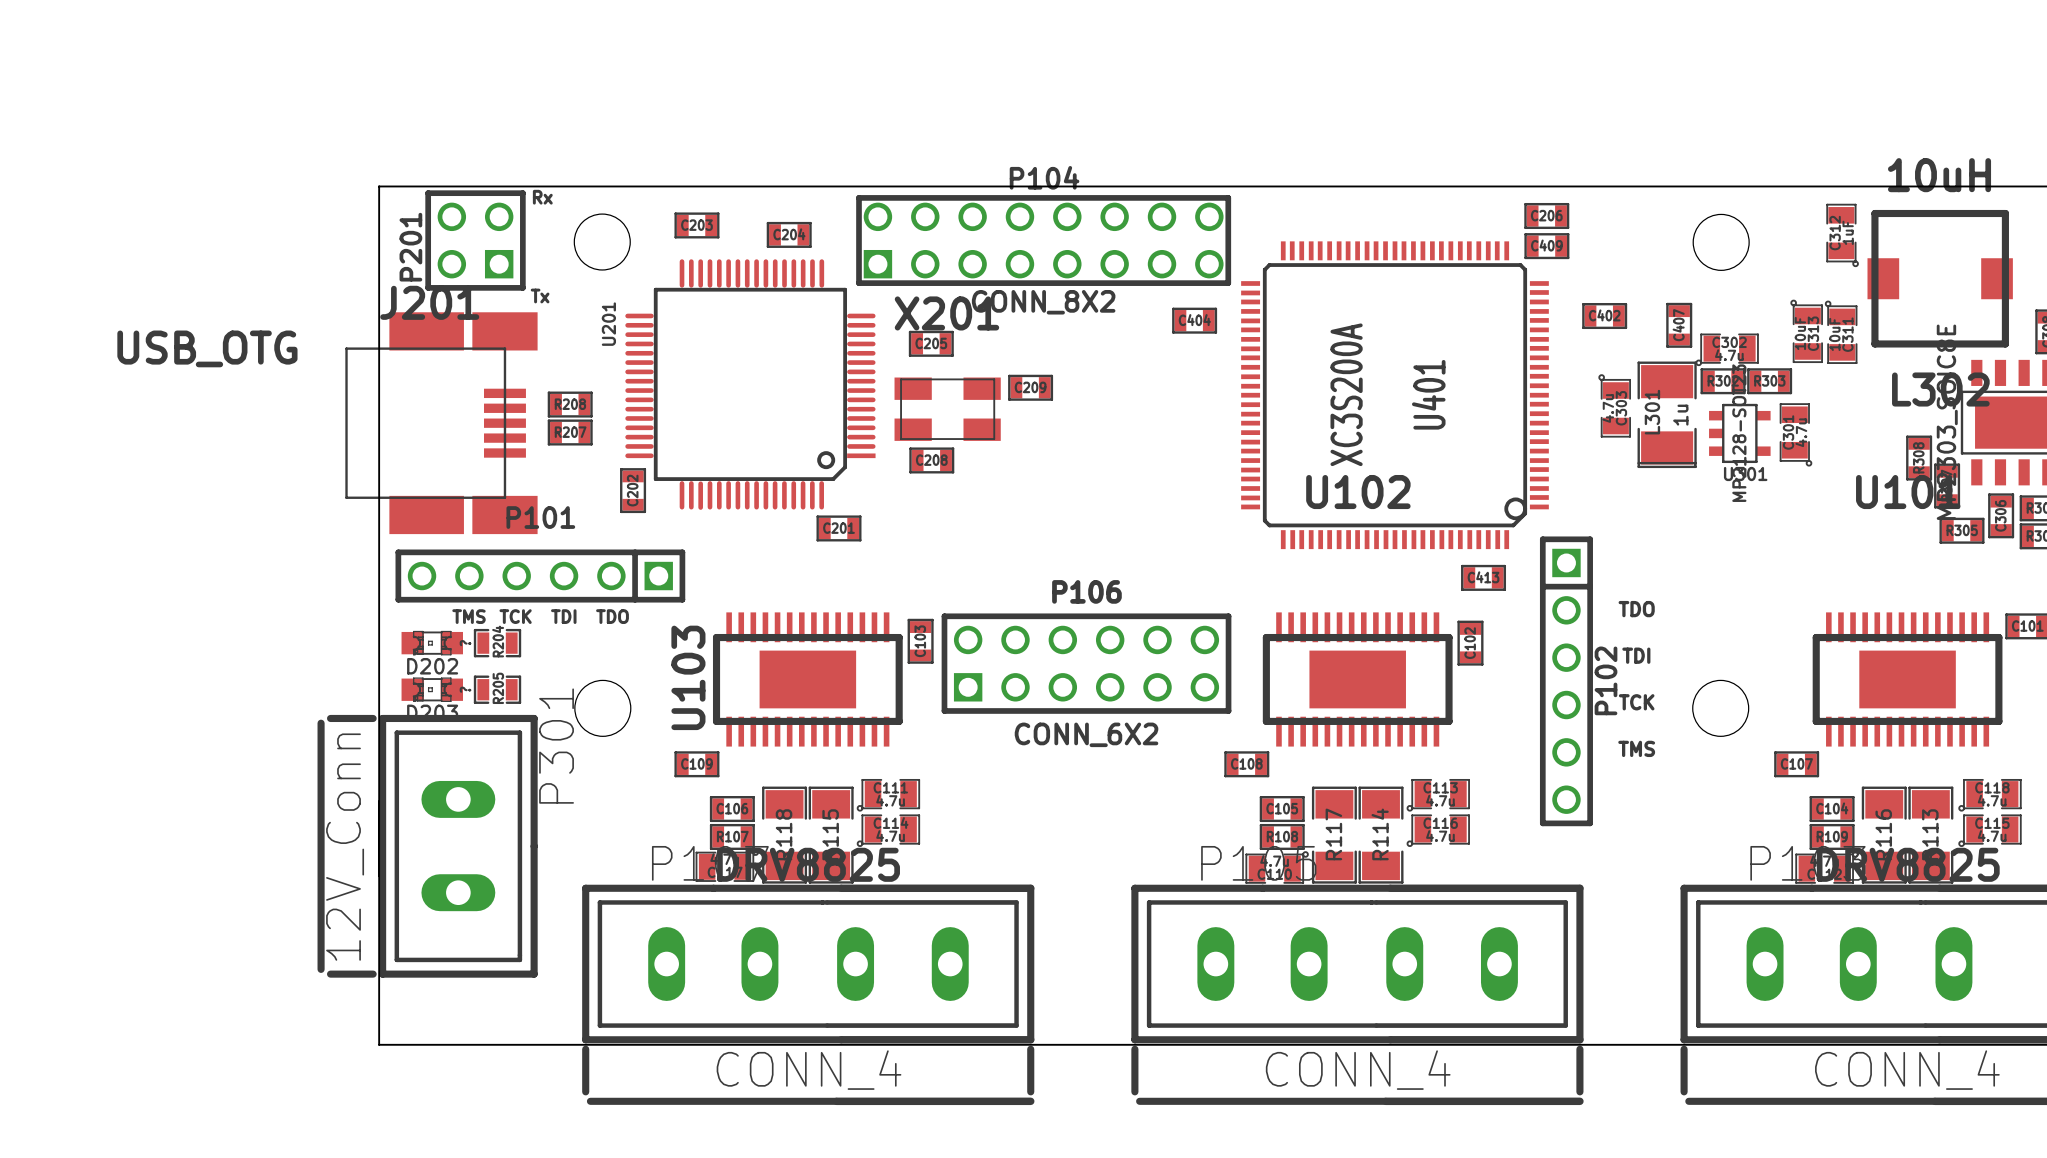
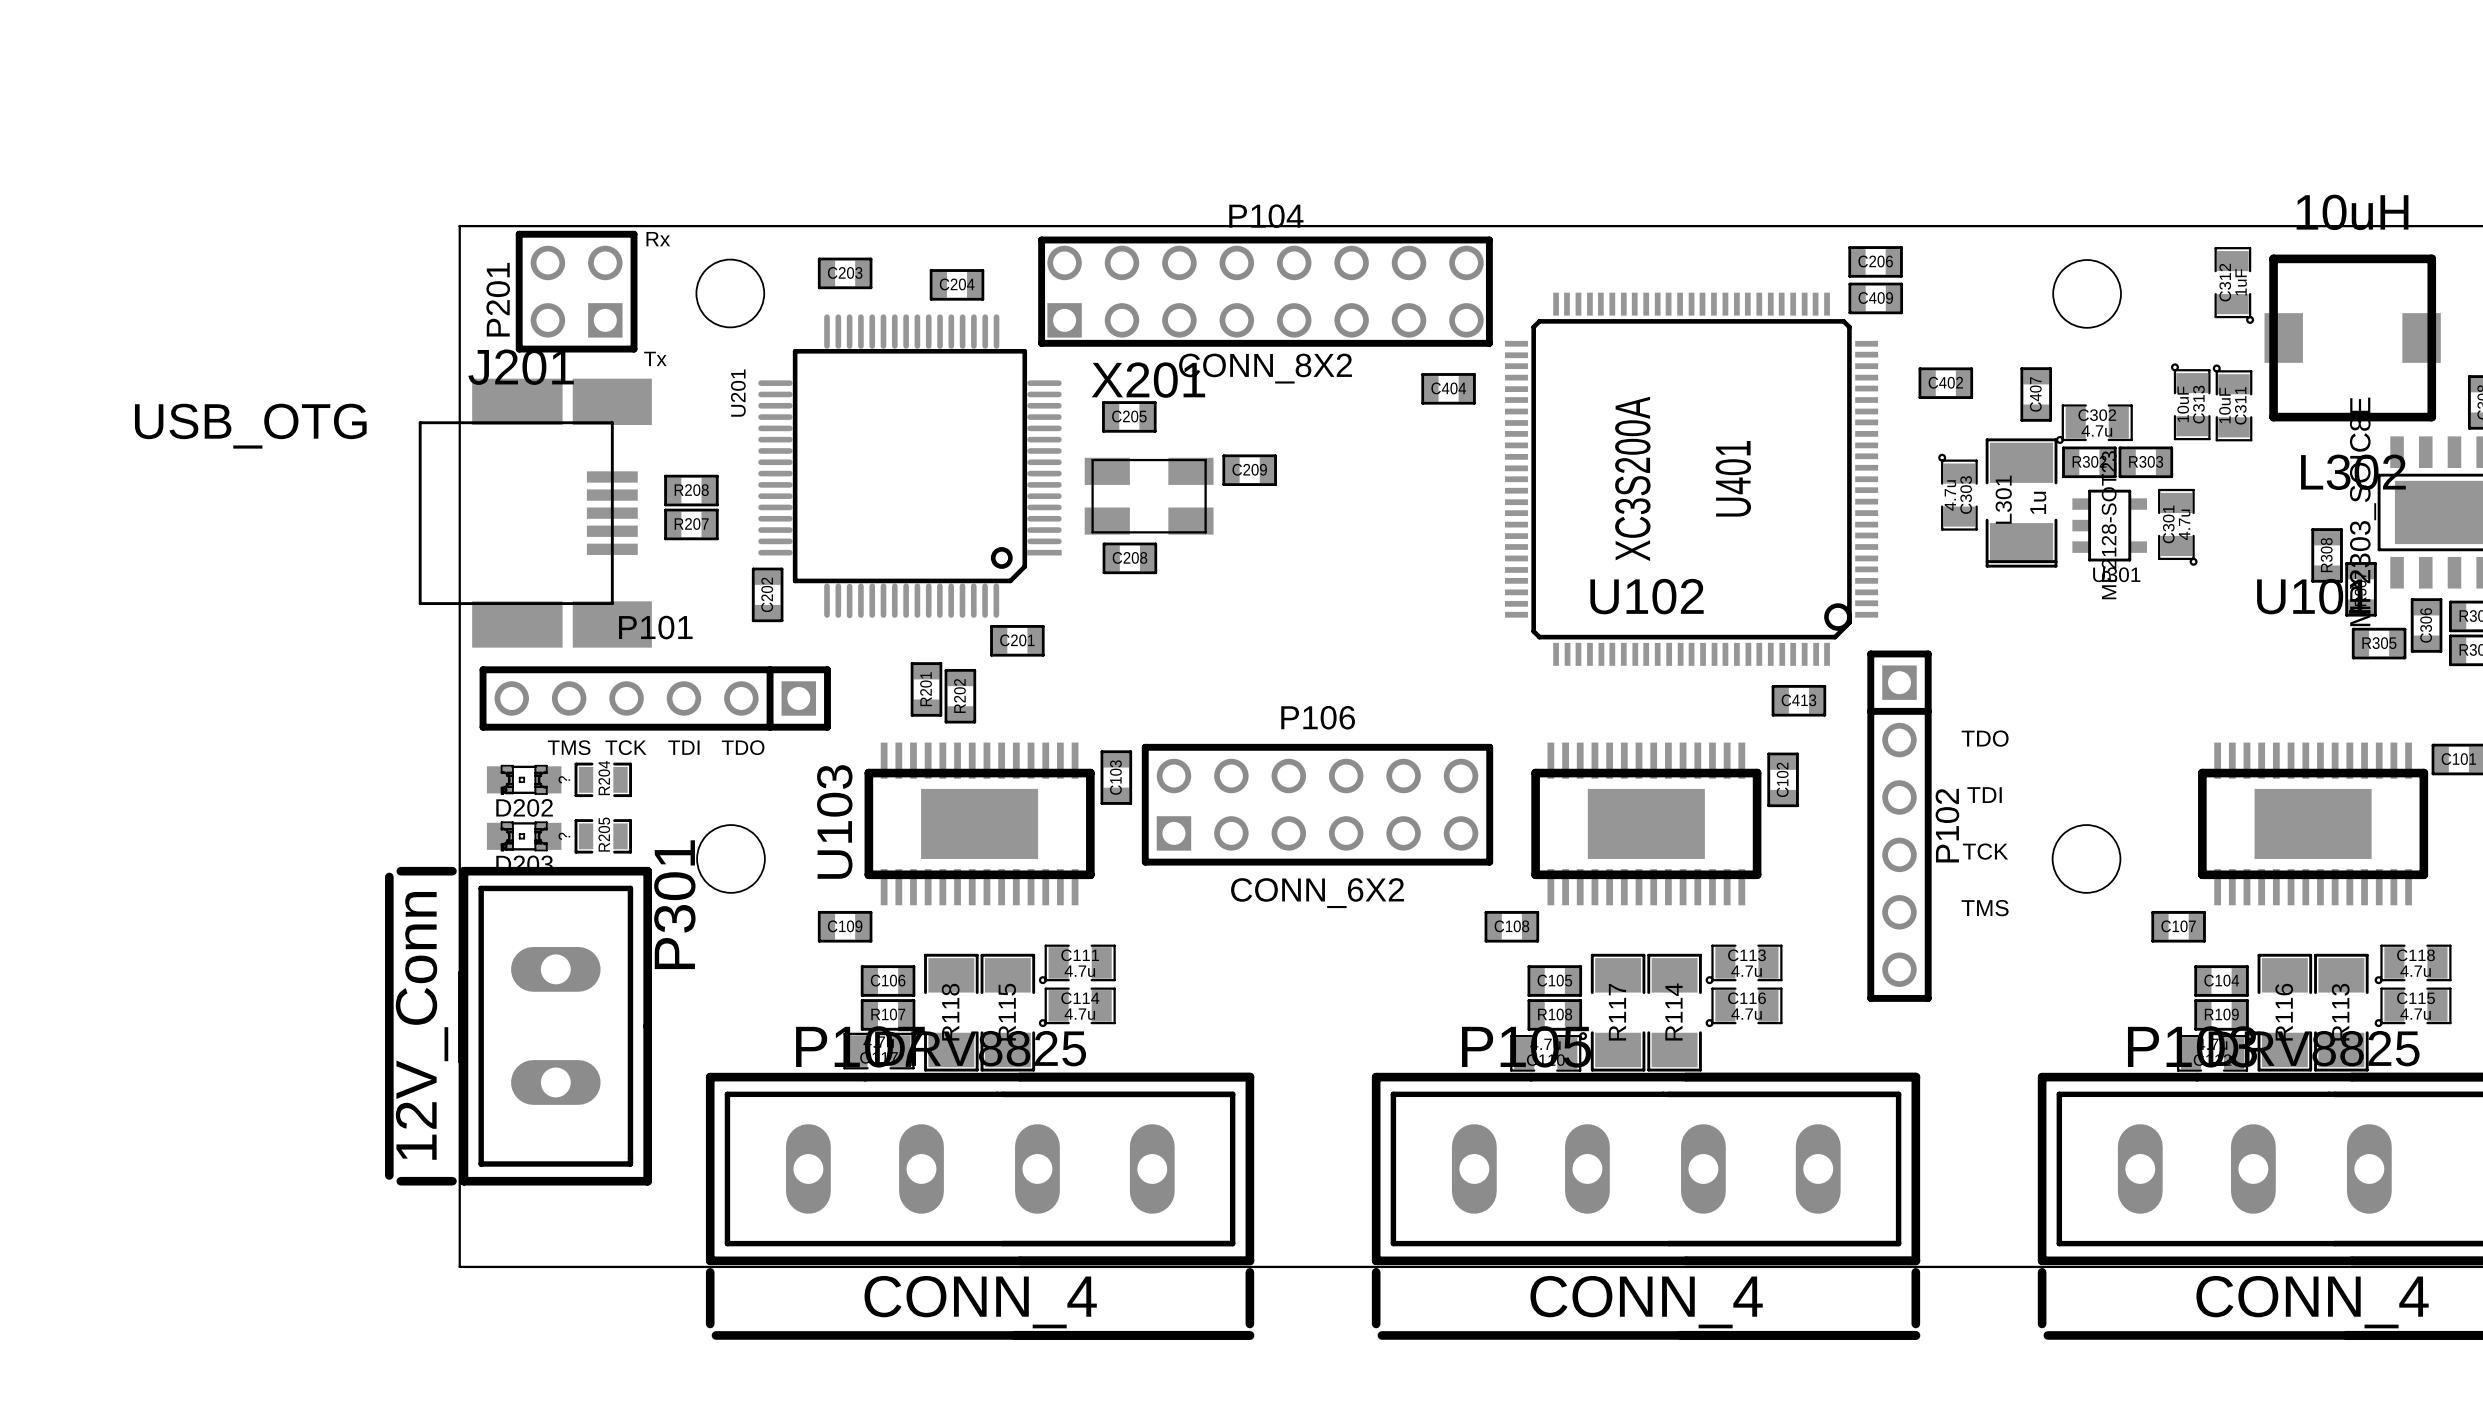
R201: none -> (926, 689)
R202: none -> (960, 696)

